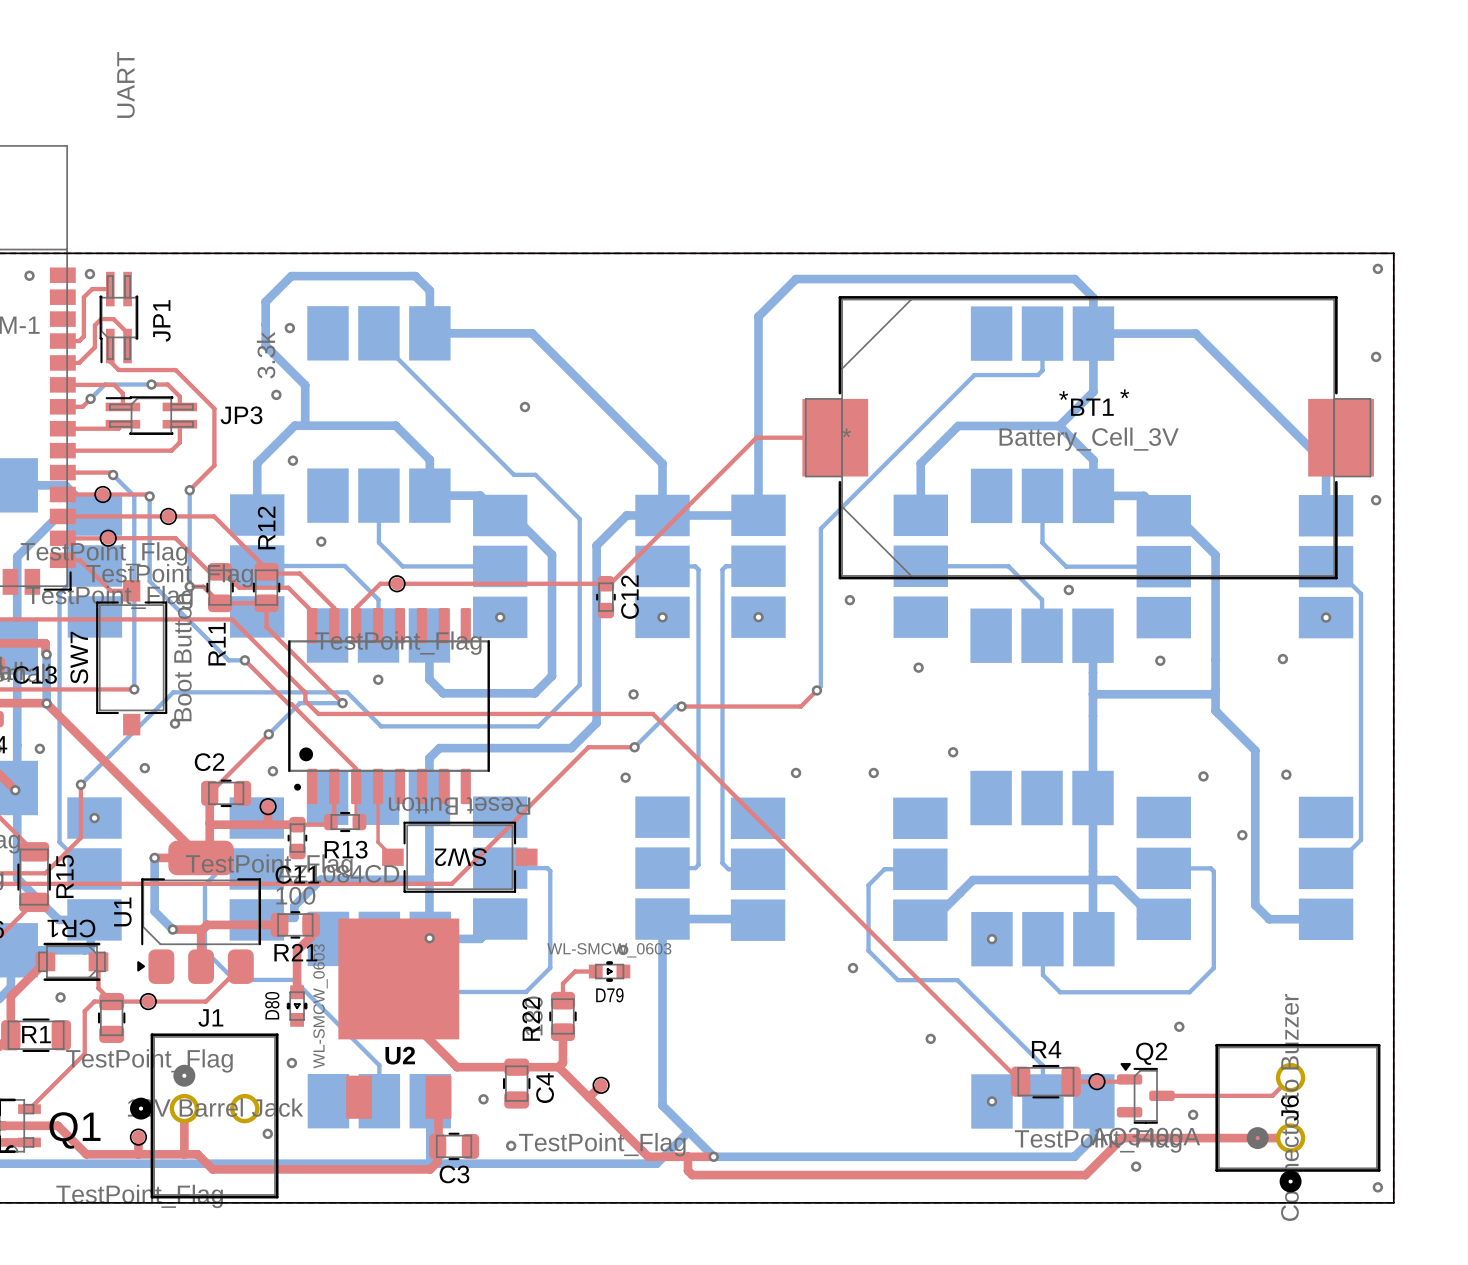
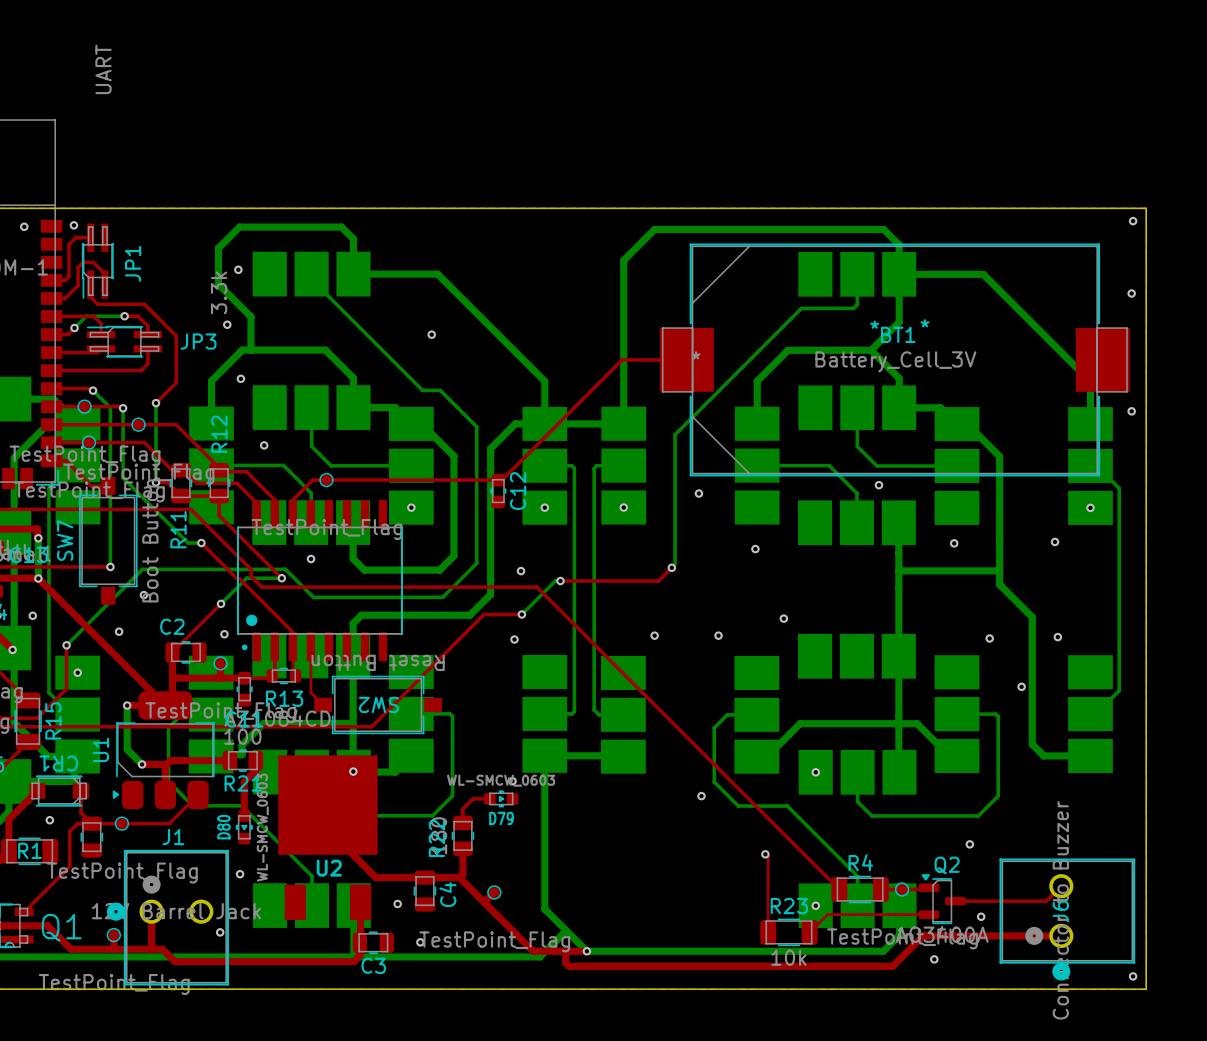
top track: none -> (765, 854) (768, 857) (768, 932)
top track: none -> (928, 914) (827, 914) (809, 932)
R23: none -> 10k (788, 932)

